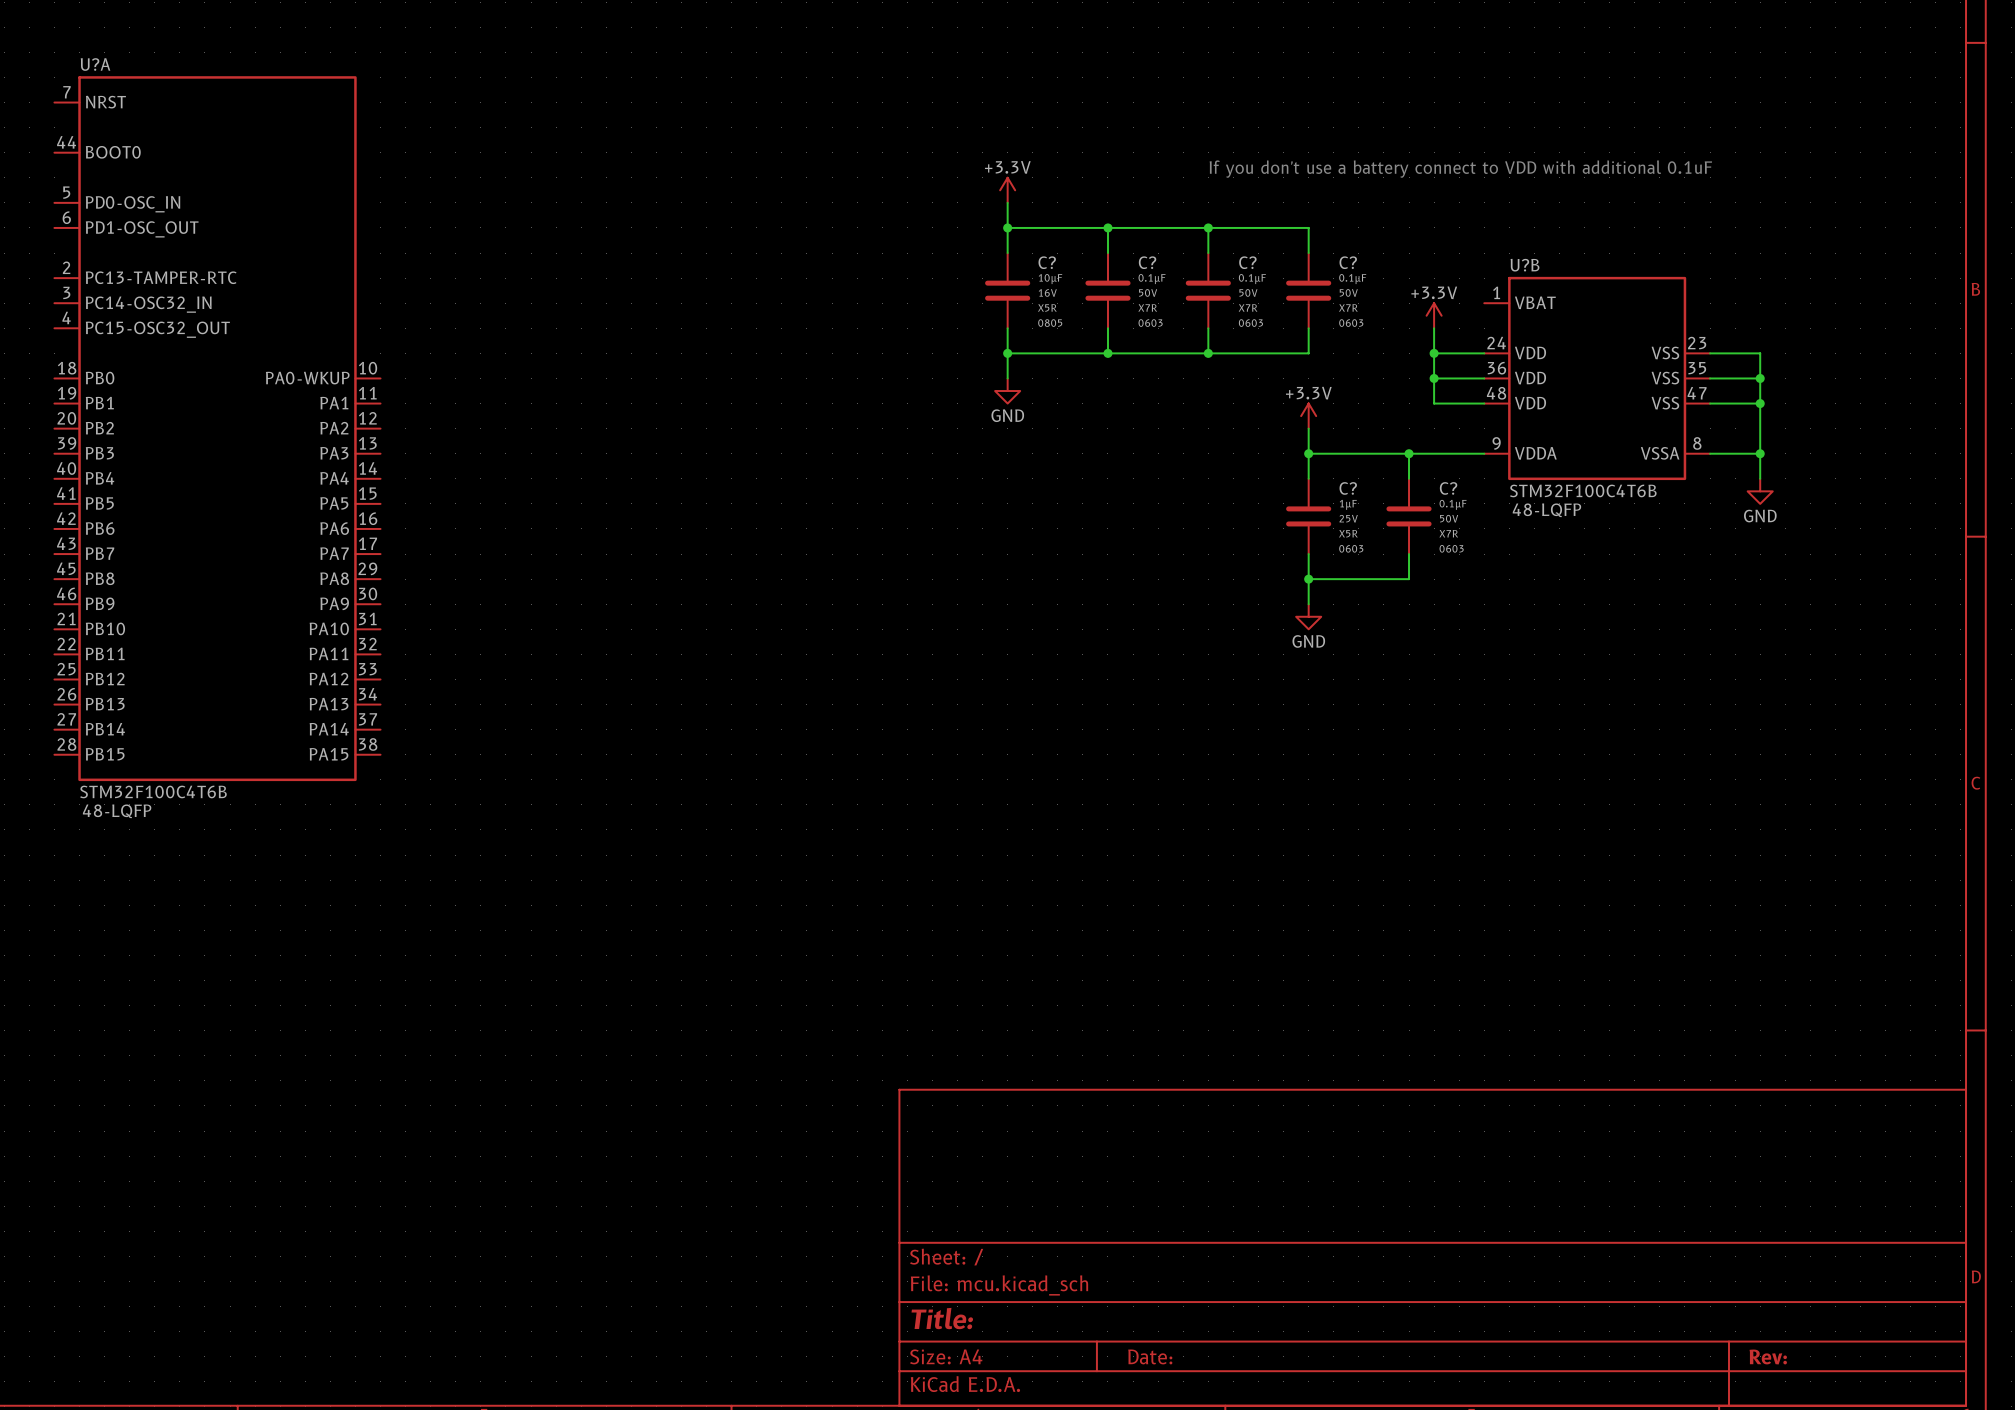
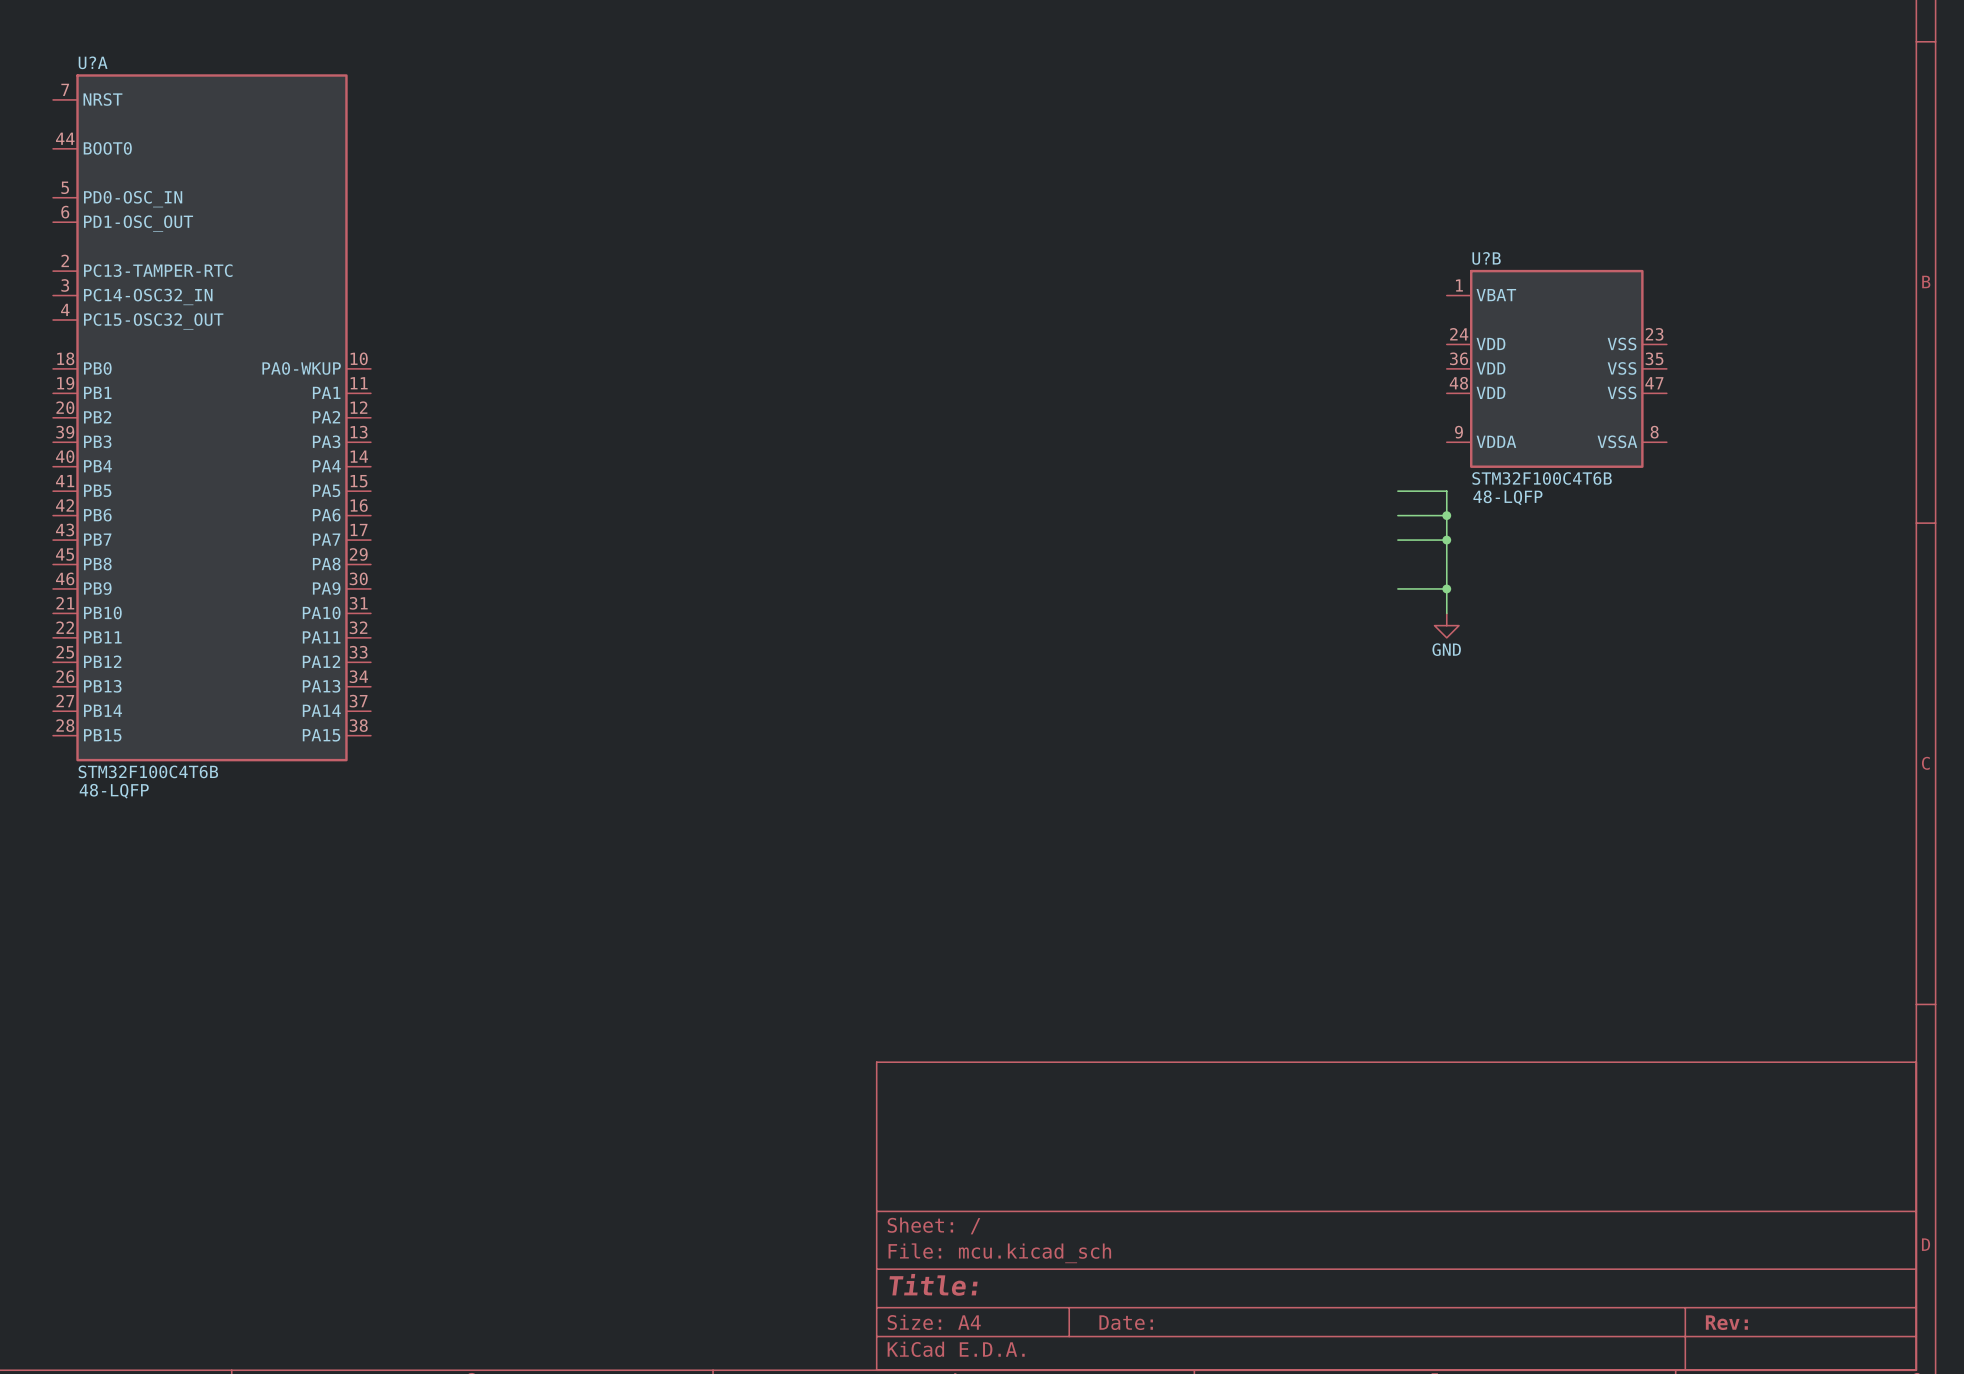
text: If you don't use a battery connect to VDD with additional 0.1uF (1460, 169) -> none
power symbol: +3.3V (1007, 190) -> none
wire: (1007, 202) (1007, 253) -> none
wire: (1007, 227) (1308, 227) (1308, 253) -> none
junction: (1007, 227) -> none
wire: (1107, 227) (1107, 253) -> none
junction: (1107, 227) -> none
wire: (1208, 227) (1208, 253) -> none
junction: (1208, 227) -> none
C?: (1007, 290) -> none
C?: (1107, 290) -> none
C?: (1208, 290) -> none
C?: (1308, 290) -> none
power symbol: +3.3V (1434, 315) -> none
wire: (1007, 328) (1007, 378) -> none
wire: (1107, 328) (1107, 353) -> none
wire: (1208, 328) (1208, 353) -> none
wire: (1308, 328) (1308, 353) (1007, 353) -> none
wire: (1434, 328) (1434, 403) (1484, 403) -> none
junction: (1007, 353) -> none
junction: (1107, 353) -> none
junction: (1208, 353) -> none
wire: (1434, 353) (1484, 353) -> (1397, 515) (1446, 515)
junction: (1434, 353) -> none
wire: (1710, 353) (1760, 353) (1760, 478) -> none
wire: (1434, 378) (1484, 378) -> (1397, 540) (1446, 540)
junction: (1434, 378) -> none
wire: (1710, 378) (1760, 378) -> none
junction: (1760, 378) -> none
power symbol: GND (1007, 391) -> none
wire: (1710, 403) (1760, 403) -> none
junction: (1760, 403) -> none
power symbol: +3.3V (1308, 416) -> none
wire: (1308, 428) (1308, 478) -> none
wire: (1308, 453) (1484, 453) -> none
junction: (1308, 453) -> none
wire: (1409, 453) (1409, 478) -> none
junction: (1409, 453) -> none
wire: (1710, 453) (1760, 453) -> none
junction: (1760, 453) -> none
power symbol: GND (1760, 491) -> none
wire: none -> (1397, 491) (1446, 491) (1446, 613)
C?: (1308, 516) -> none
C?: (1409, 516) -> none
junction: none -> (1446, 515)
wire: (1308, 554) (1308, 604) -> none
wire: (1409, 554) (1409, 579) (1308, 579) -> none
junction: none -> (1446, 540)
junction: (1308, 579) -> none
wire: none -> (1397, 588) (1446, 588)
junction: none -> (1446, 588)
power symbol: GND (1308, 616) -> none
power symbol: none -> GND (1446, 625)

